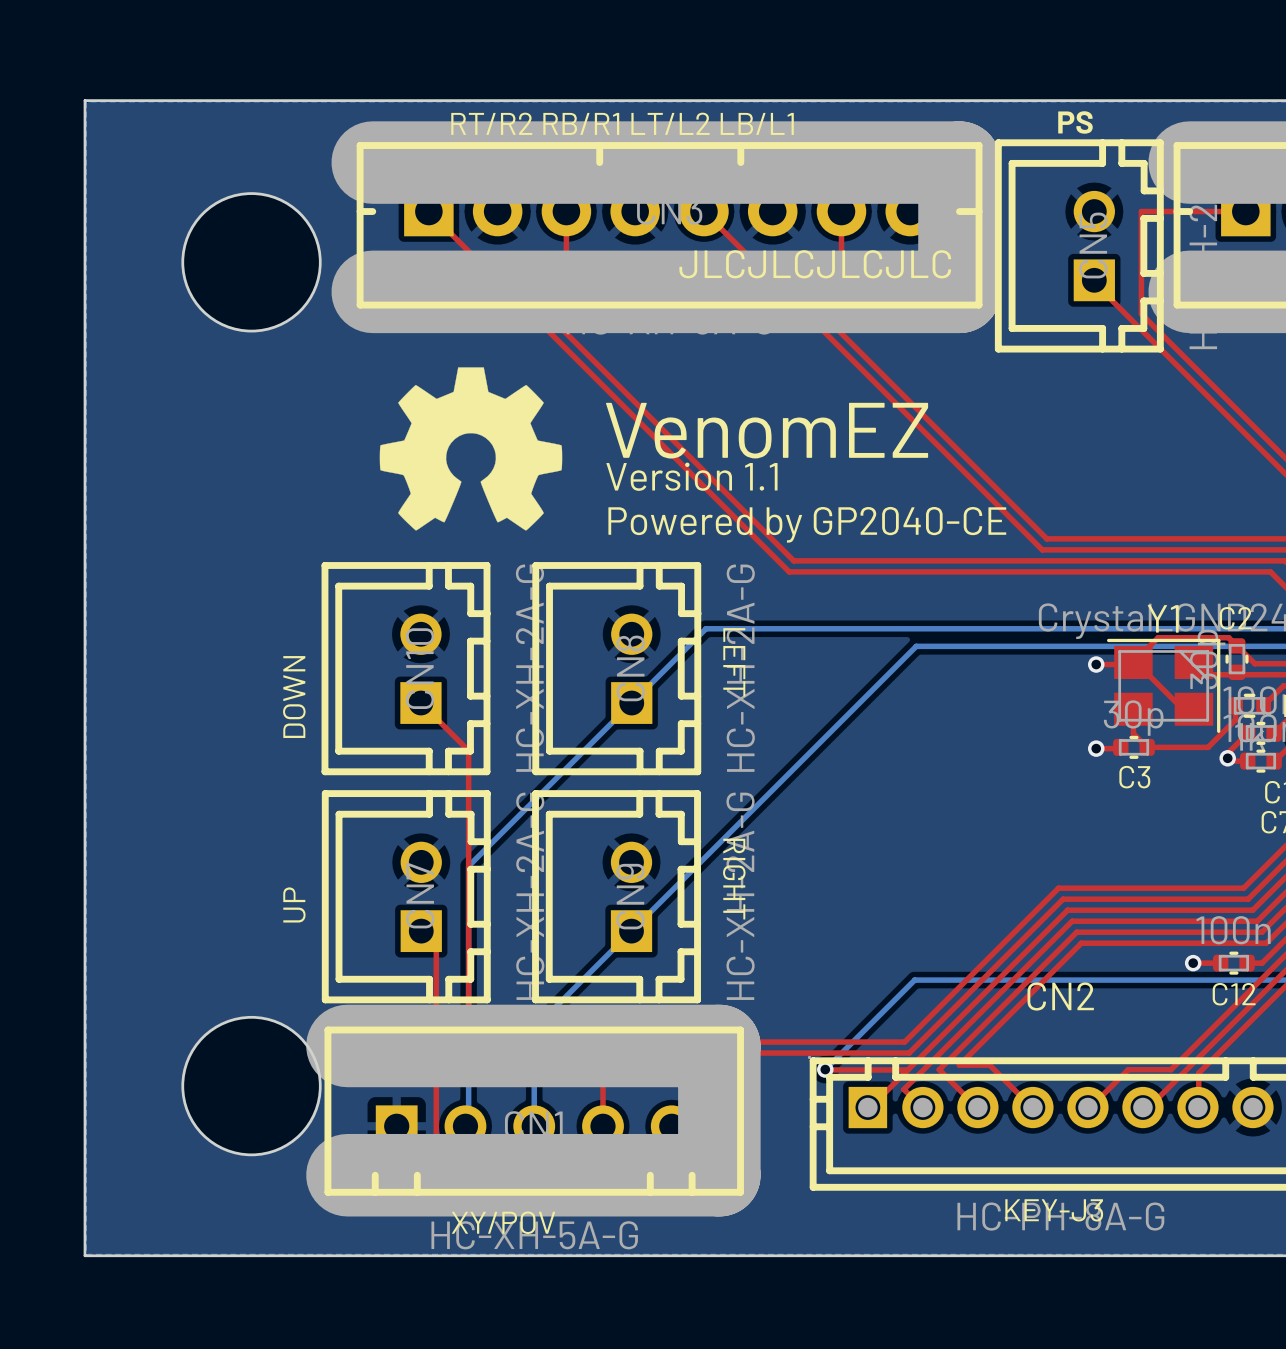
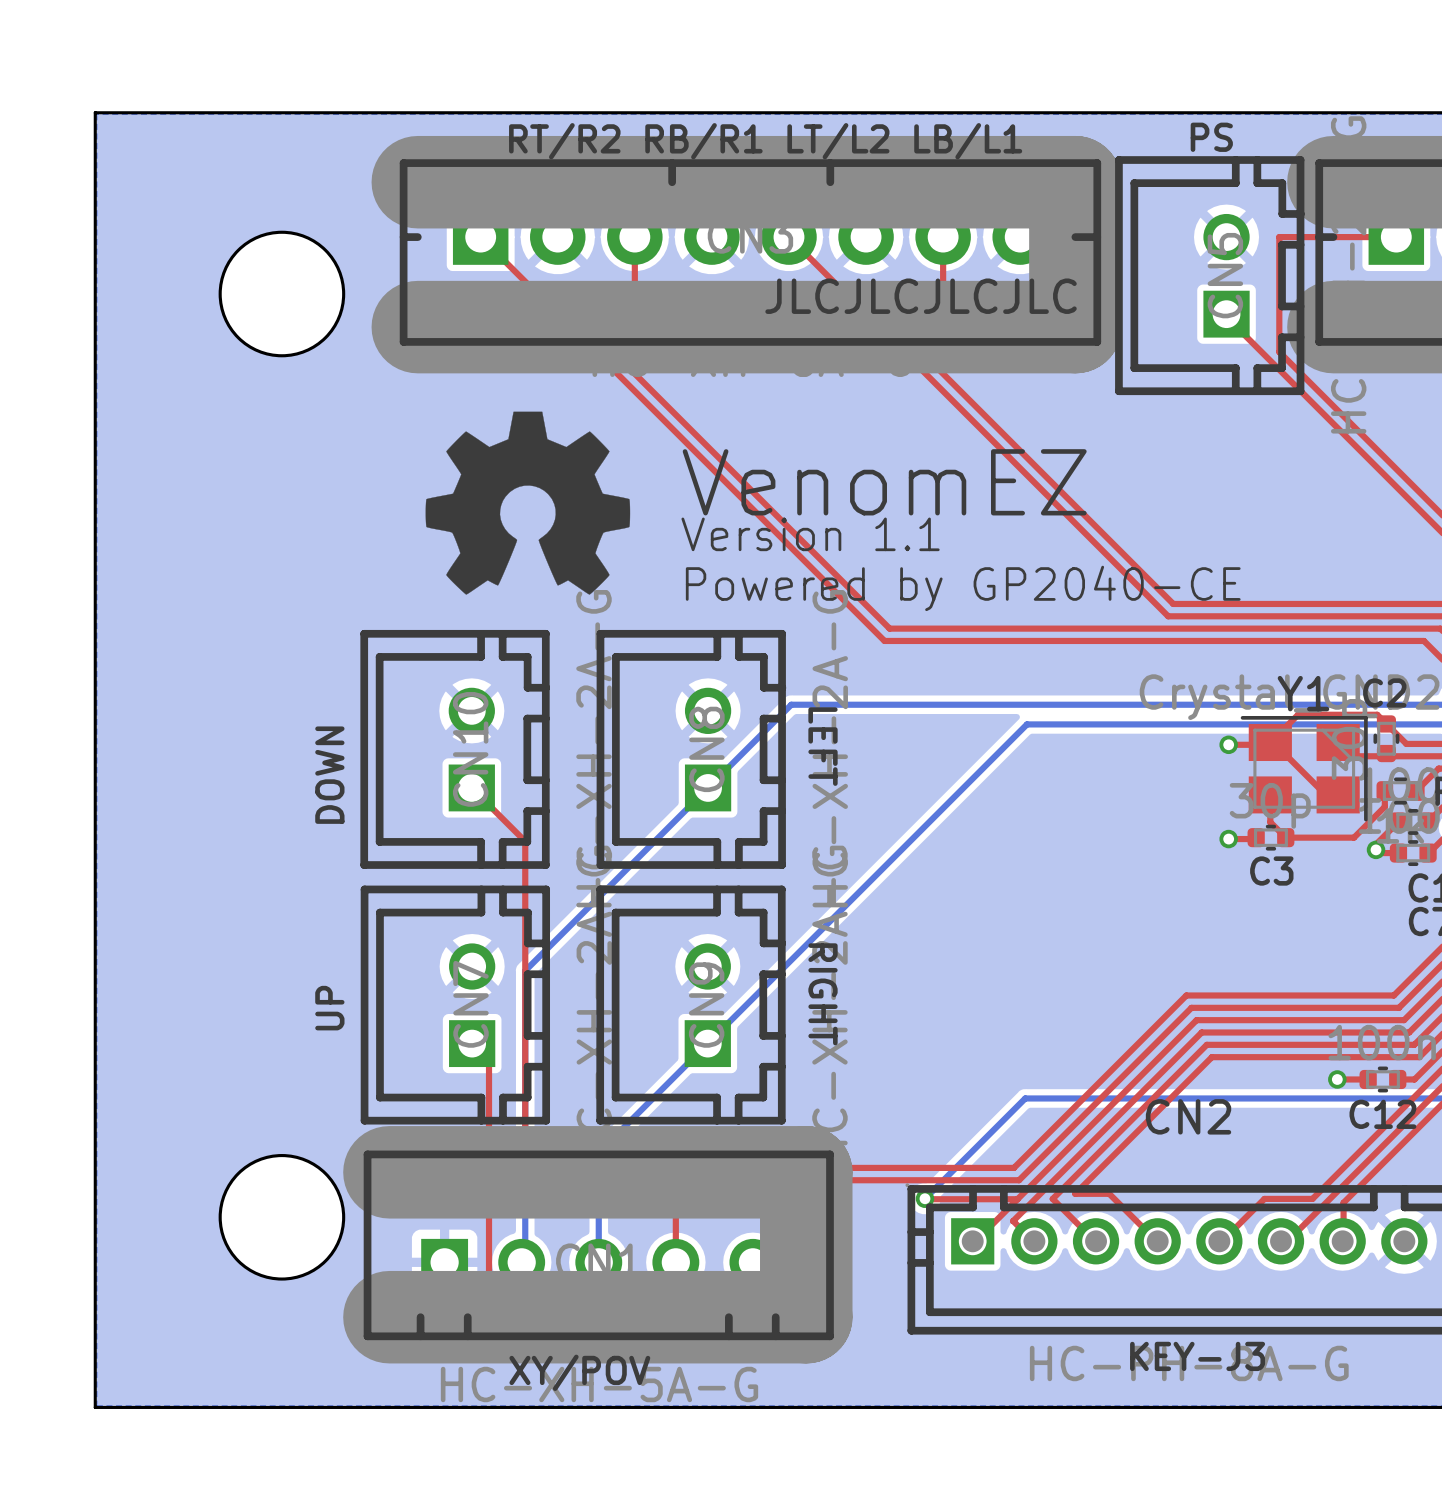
round board edge size: [181, 192, 322, 333] -> [218, 230, 346, 358]
round board edge size: [181, 1015, 322, 1157] -> [218, 1154, 346, 1281]

